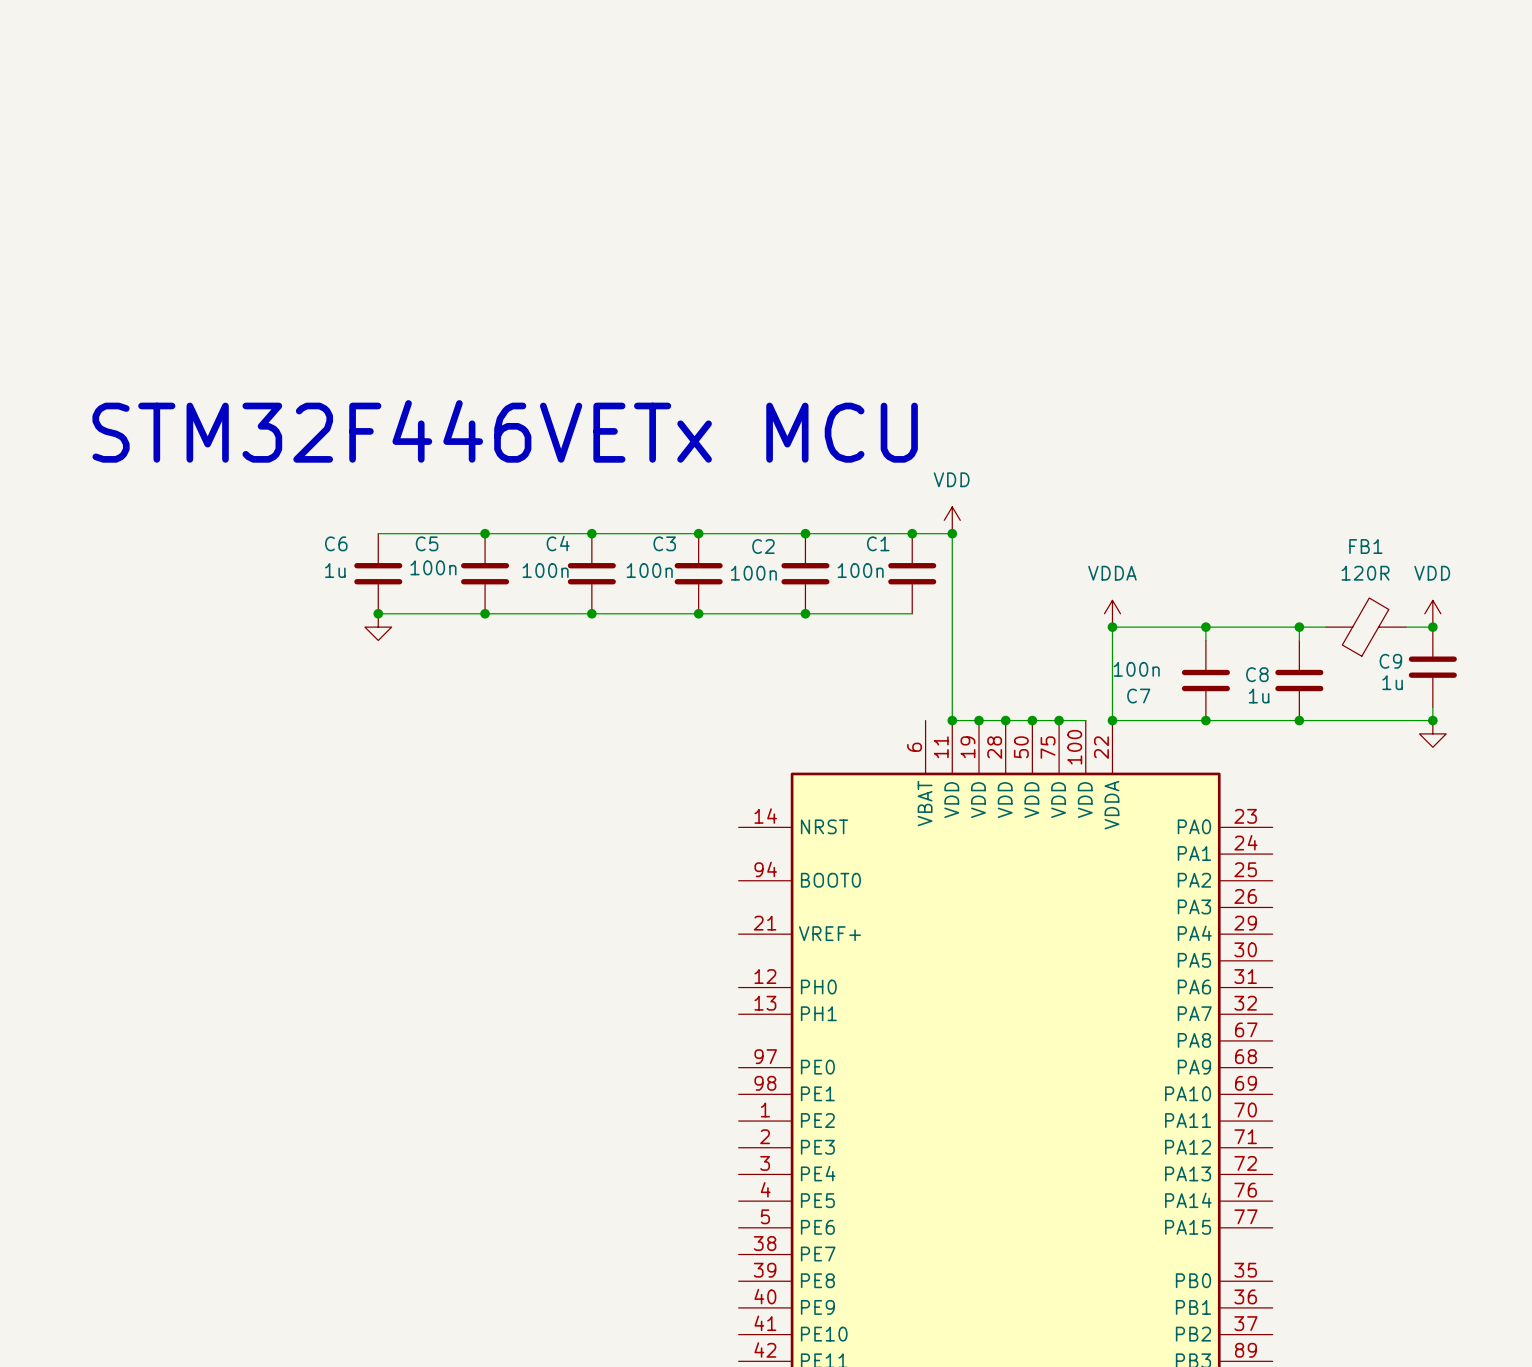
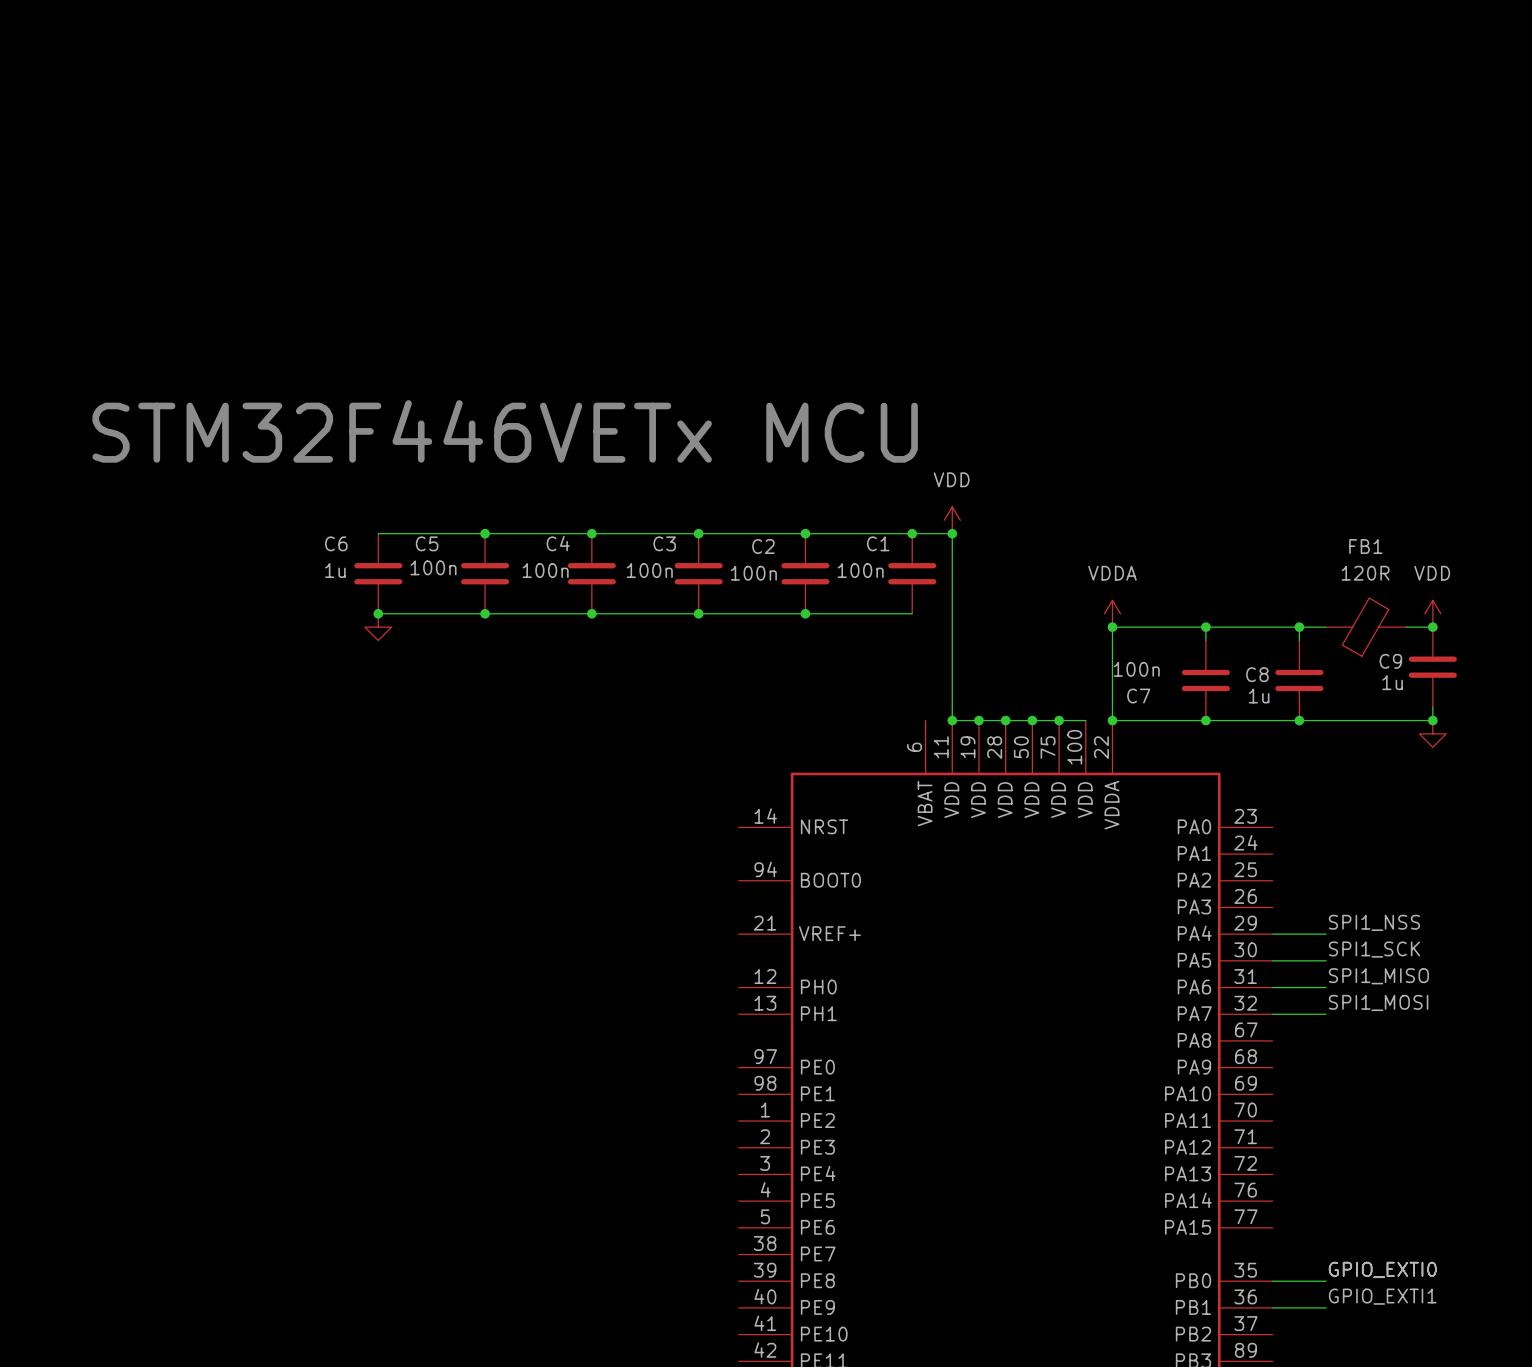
label: none -> SPI1_NSS (1374, 922)
wire: none -> (1272, 934) (1326, 934)
label: none -> SPI1_SCK (1374, 949)
wire: none -> (1272, 960) (1326, 960)
label: none -> SPI1_MISO (1378, 976)
wire: none -> (1272, 987) (1326, 987)
label: none -> SPI1_MOSI (1378, 1002)
wire: none -> (1272, 1014) (1326, 1014)
label: none -> GPIO_EXTI0 (1382, 1269)
wire: none -> (1272, 1281) (1326, 1281)
label: none -> GPIO_EXTI1 (1382, 1296)
wire: none -> (1272, 1307) (1326, 1307)

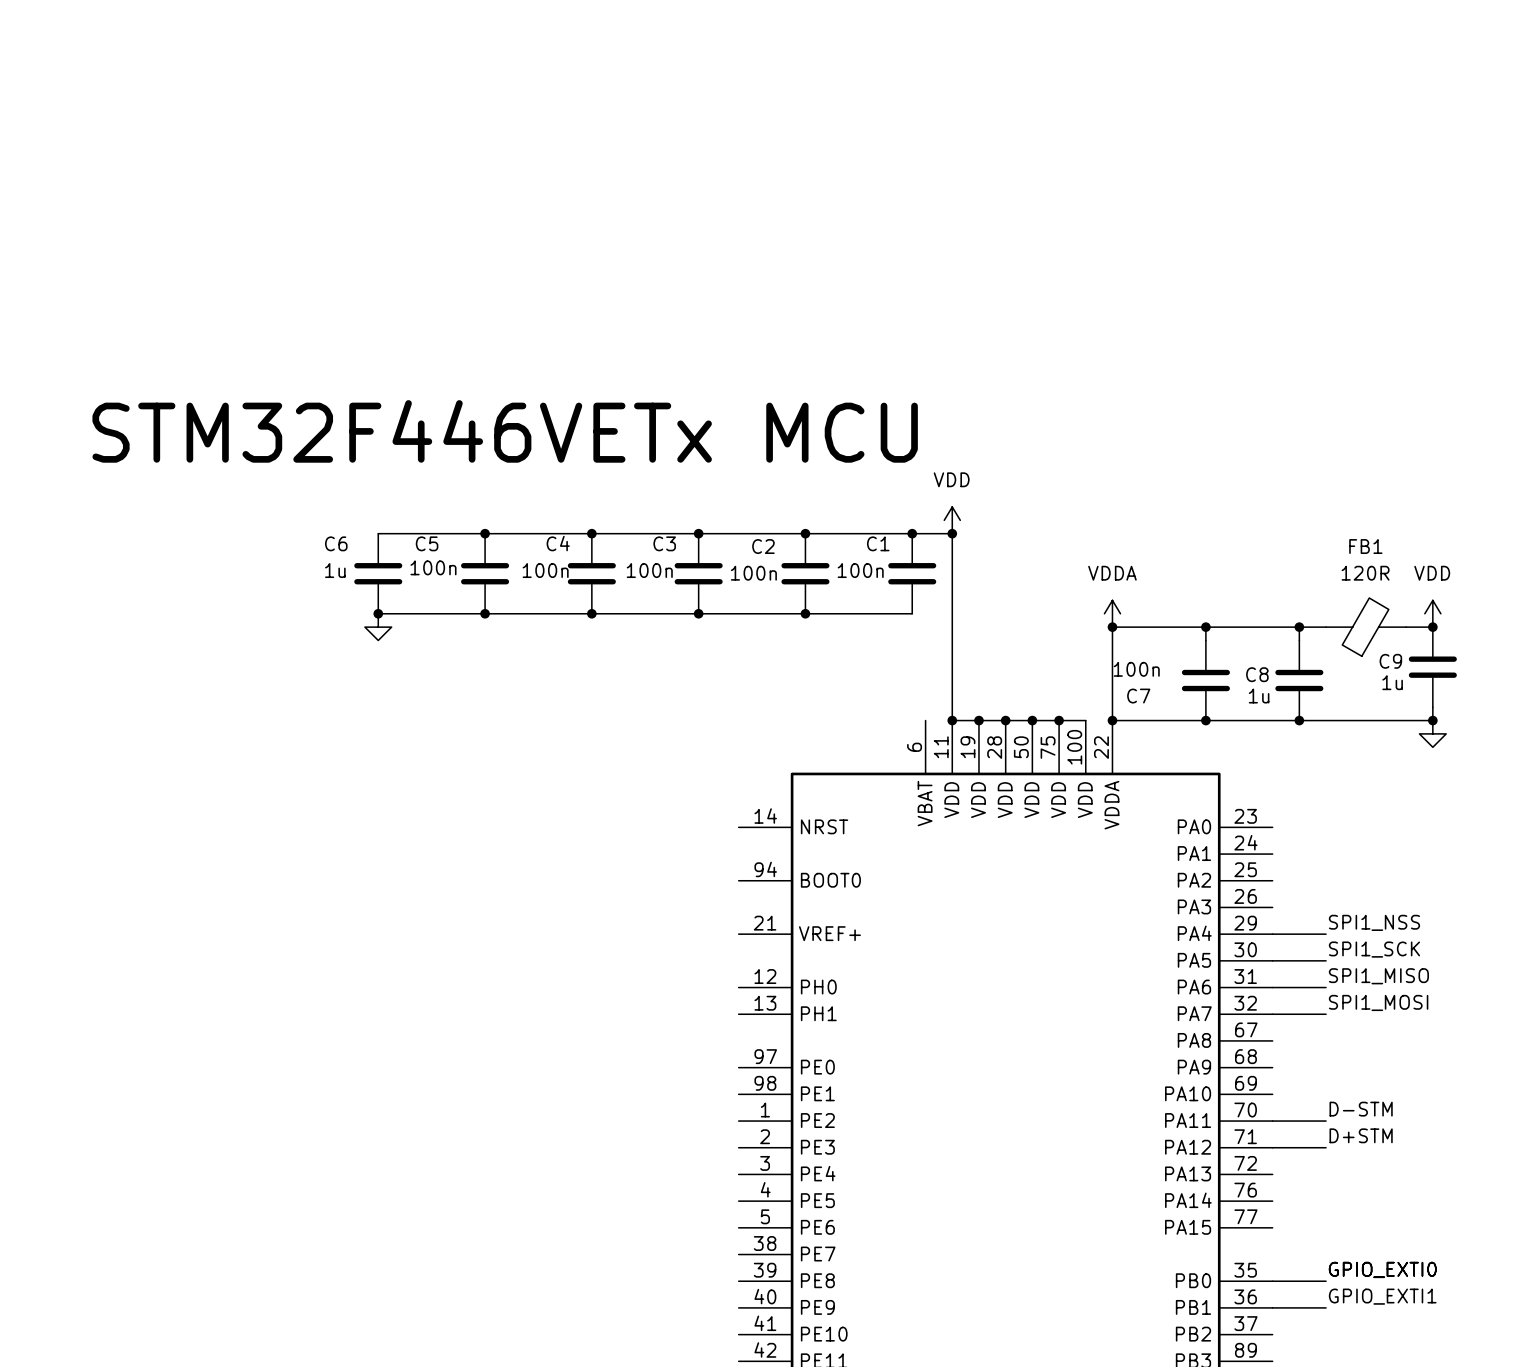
label: none -> D-STM (1361, 1109)
wire: none -> (1272, 1121) (1326, 1121)
label: none -> D+STM (1361, 1135)
wire: none -> (1272, 1147) (1326, 1147)

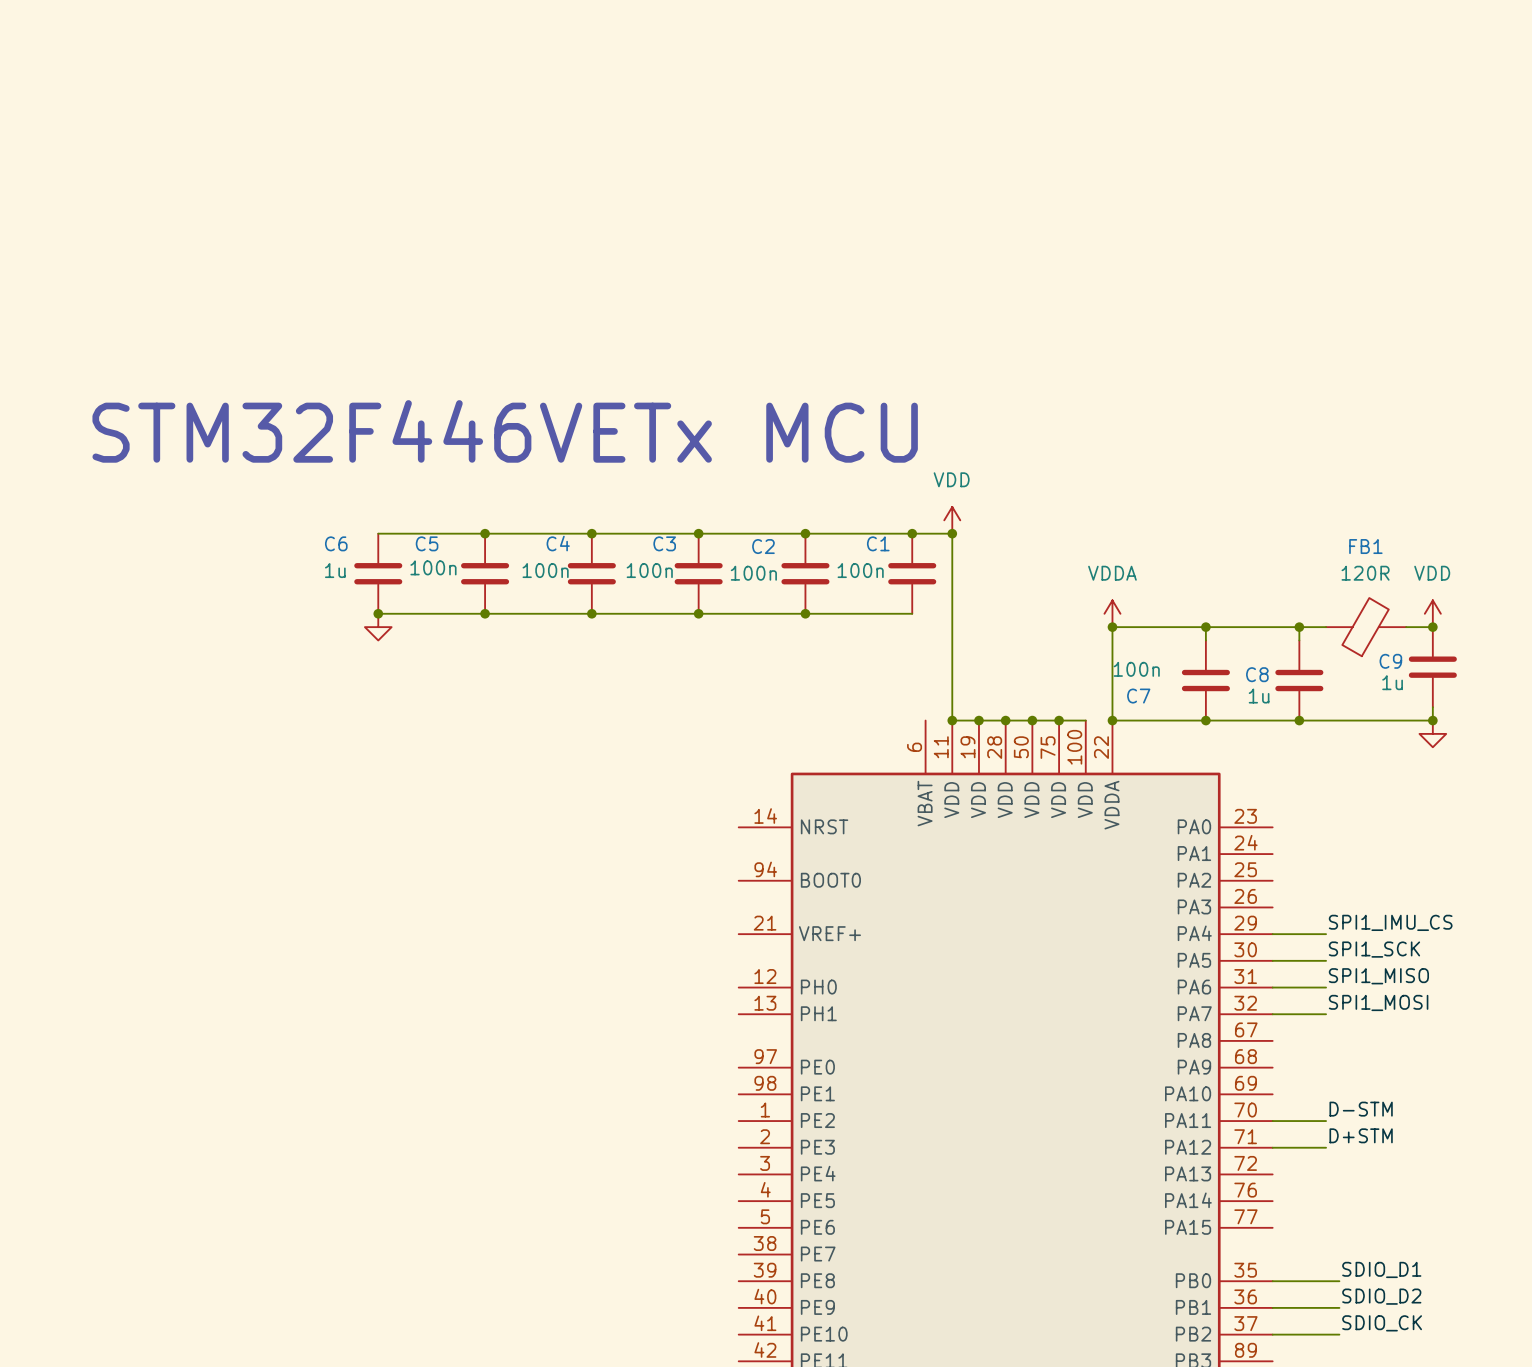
label: SPI1_NSS (1374, 922) -> SPI1_IMU_CS (1390, 922)
label: none -> SDIO_D1 (1381, 1269)
label: GPIO_EXTI0 (1382, 1269) -> none
wire: none -> (1326, 1281) (1339, 1281)
label: none -> SDIO_D2 (1381, 1296)
label: GPIO_EXTI1 (1382, 1296) -> none
wire: none -> (1326, 1307) (1339, 1307)
label: none -> SDIO_CK (1382, 1323)
wire: none -> (1272, 1334) (1339, 1334)

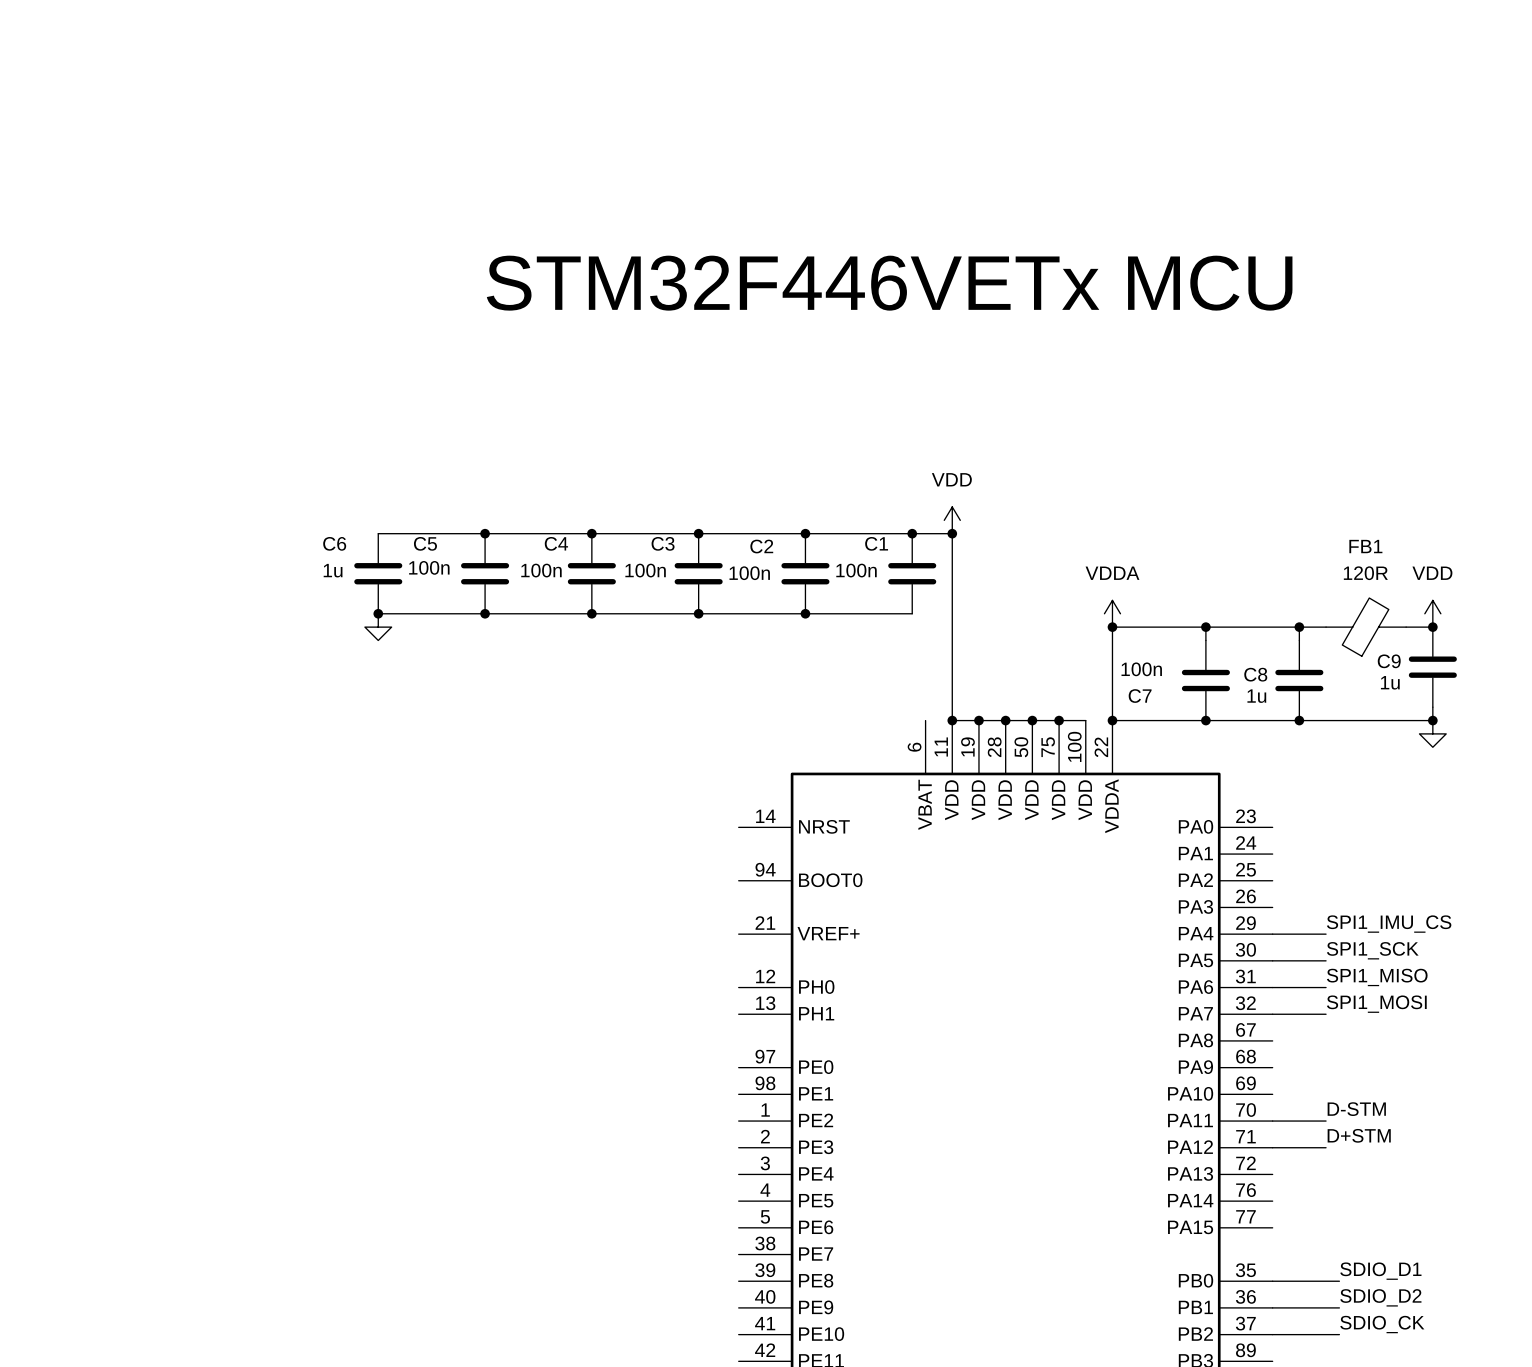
text: none -> STM32F446VETx MCU (889, 283)
text: STM32F446VETx MCU (505, 431) -> none

